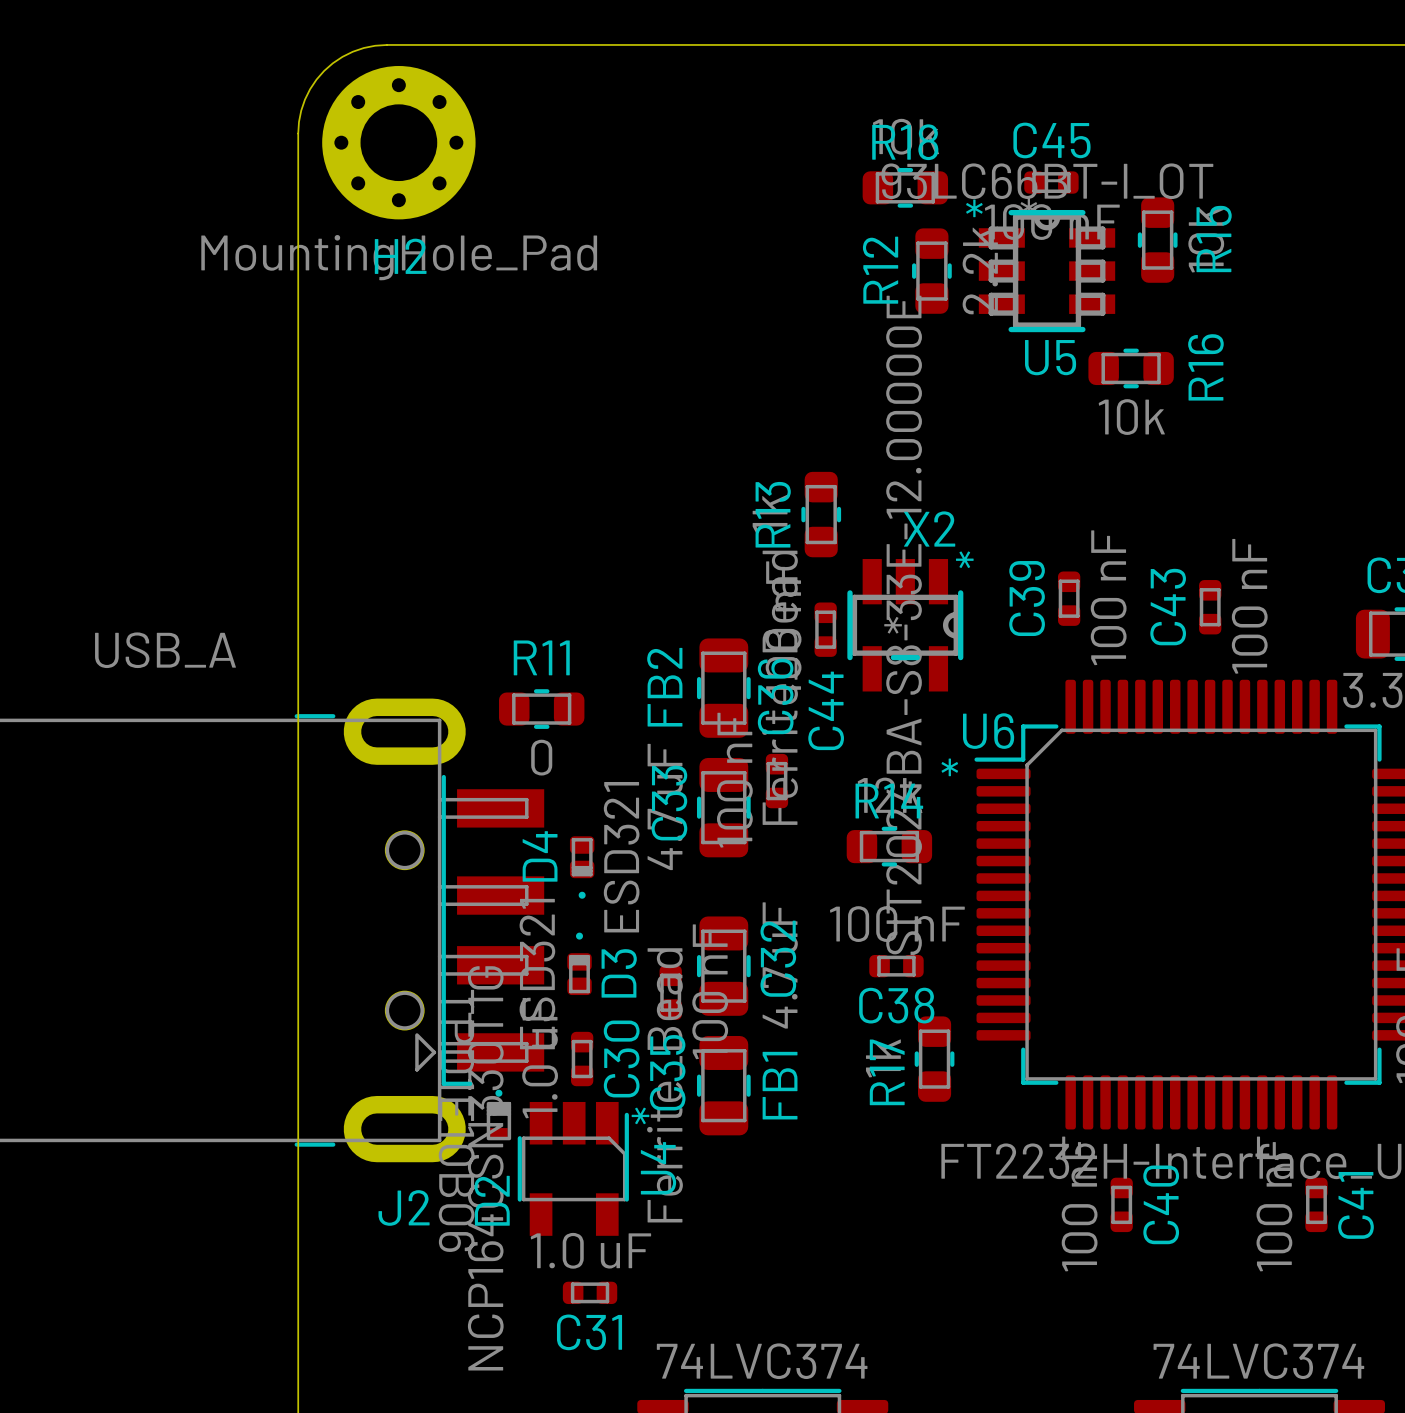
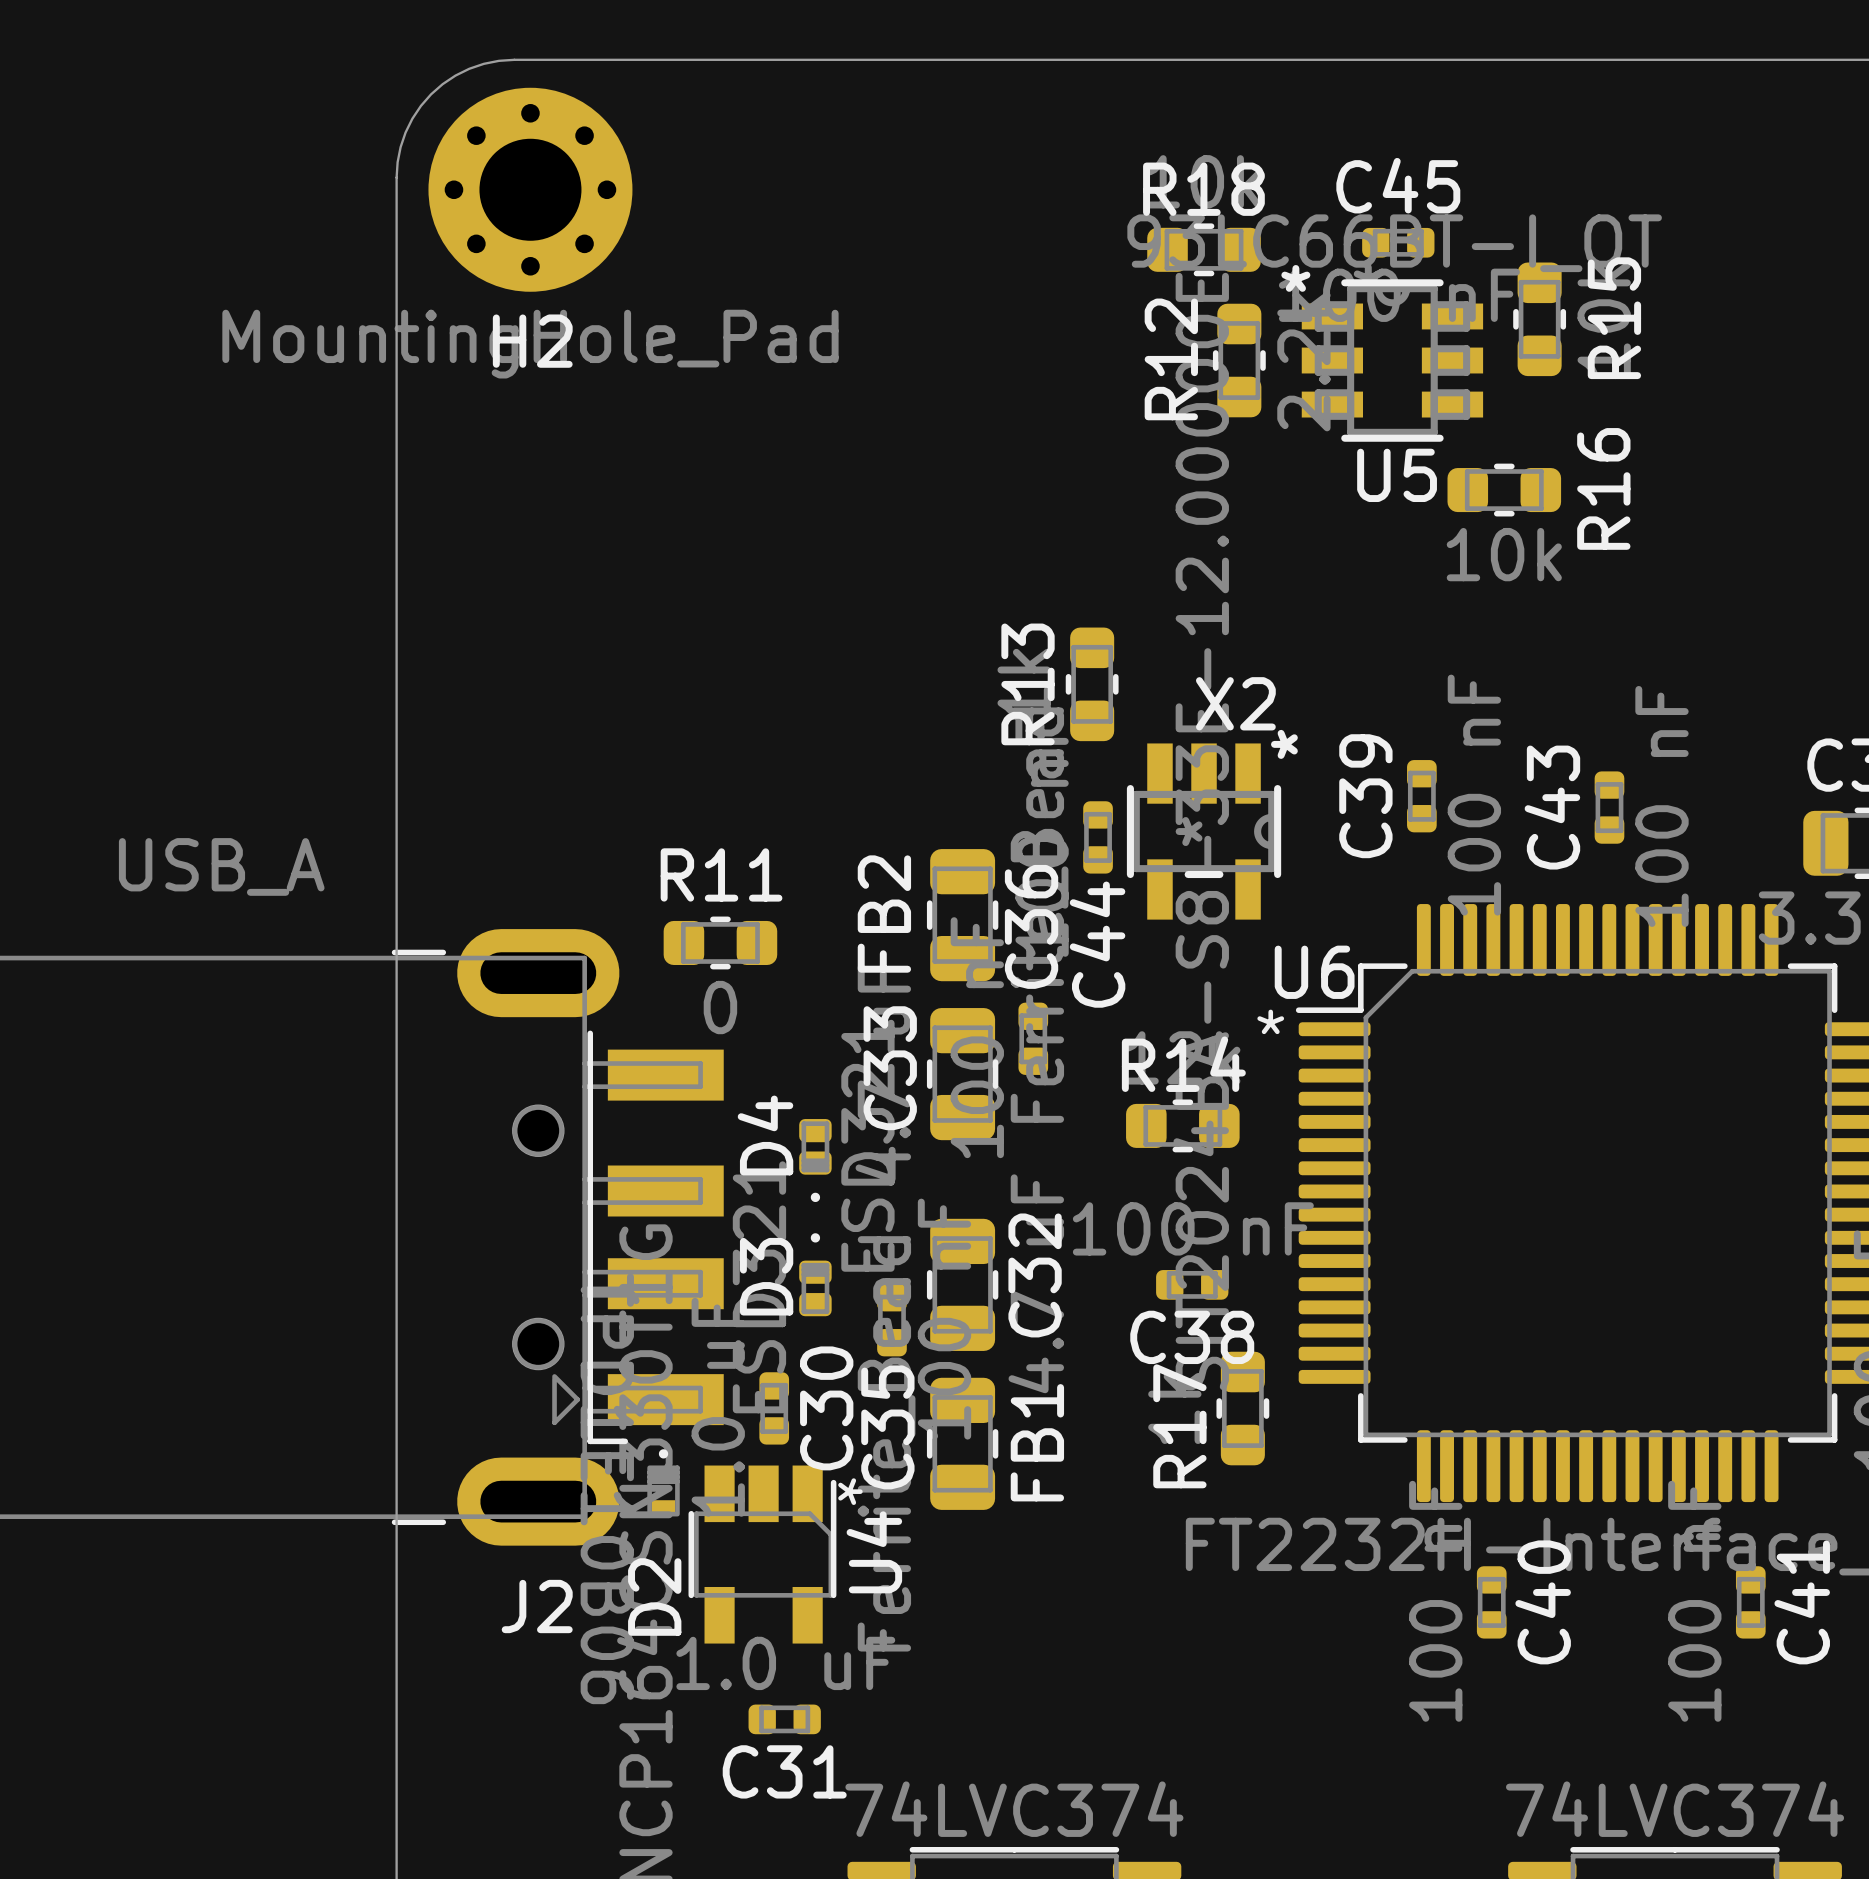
D4 name position: D4 (540, 856) -> D4 (765, 1135)
D4 position: (582, 867) -> (815, 1160)
D3 position: (579, 963) -> (815, 1274)
D3 name position: D3 (619, 973) -> D3 (766, 1276)

